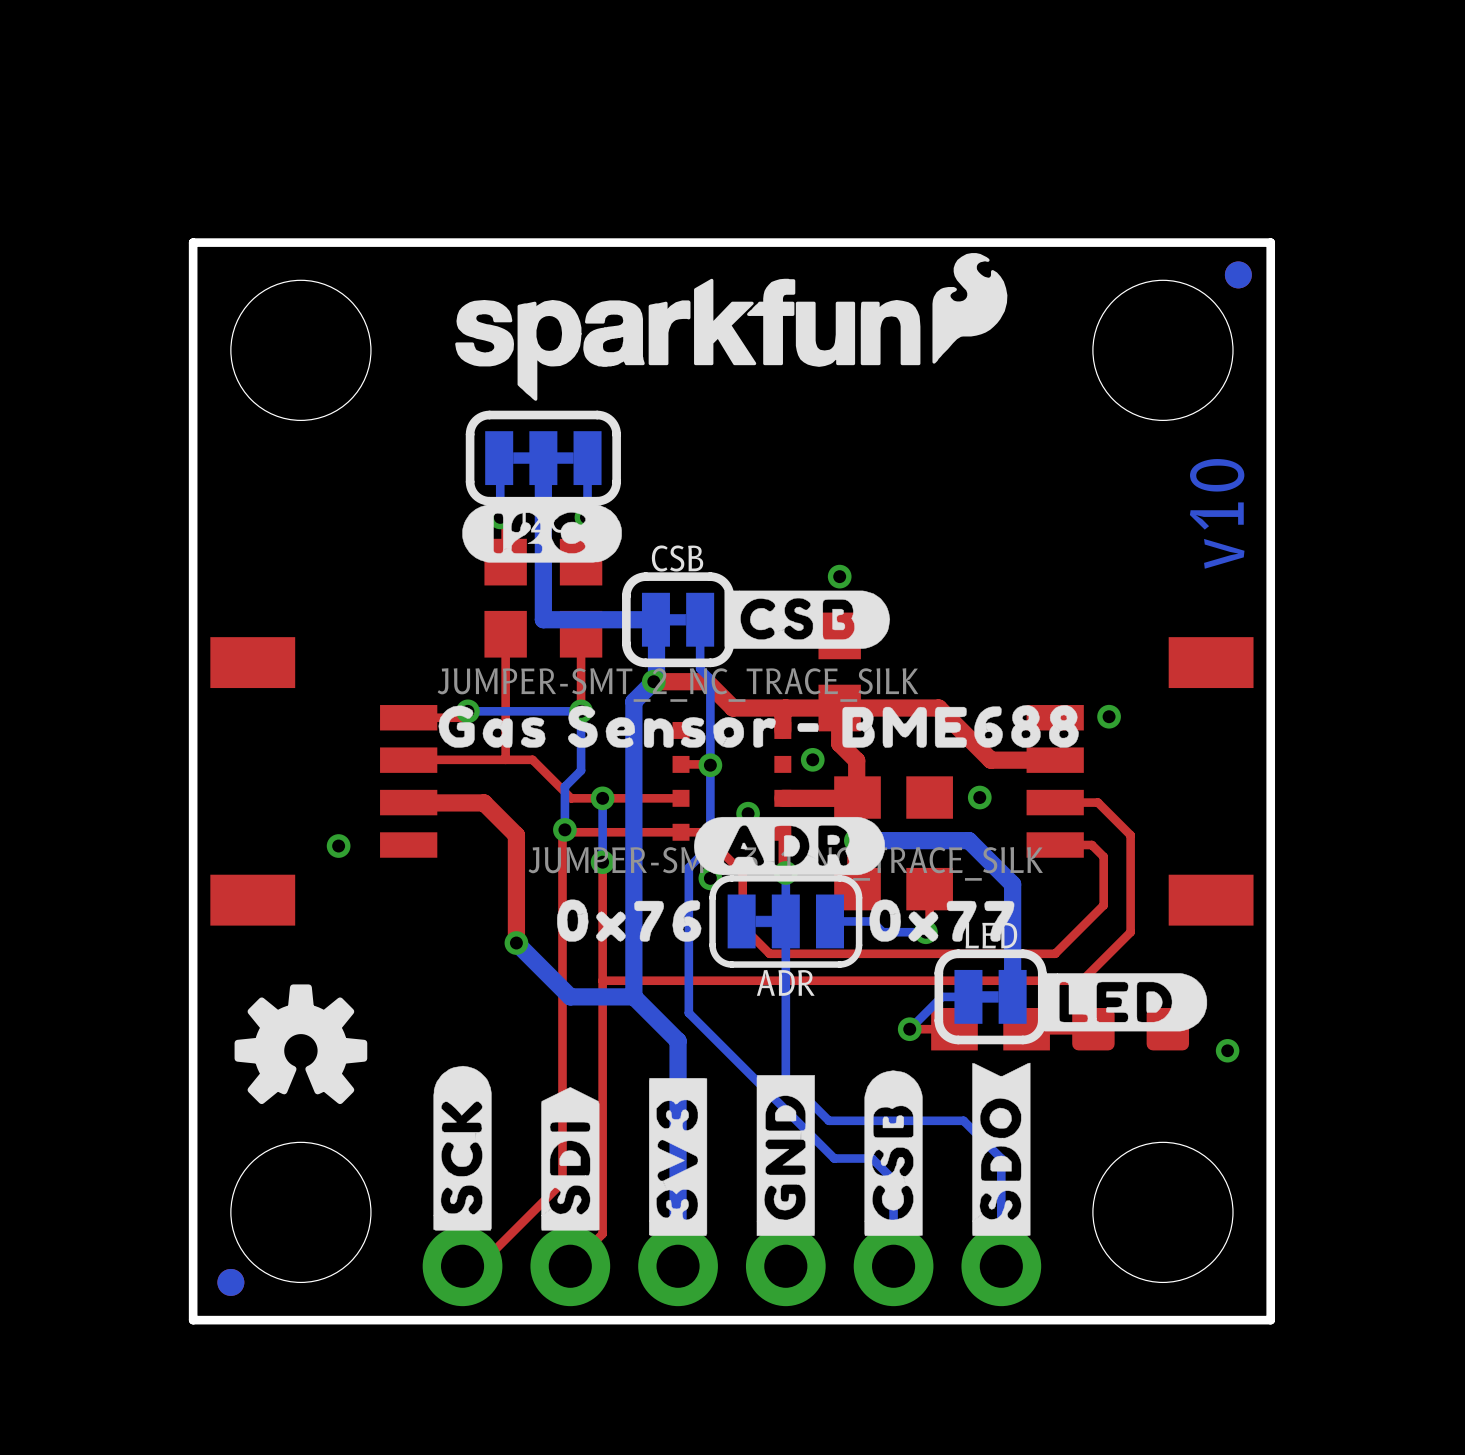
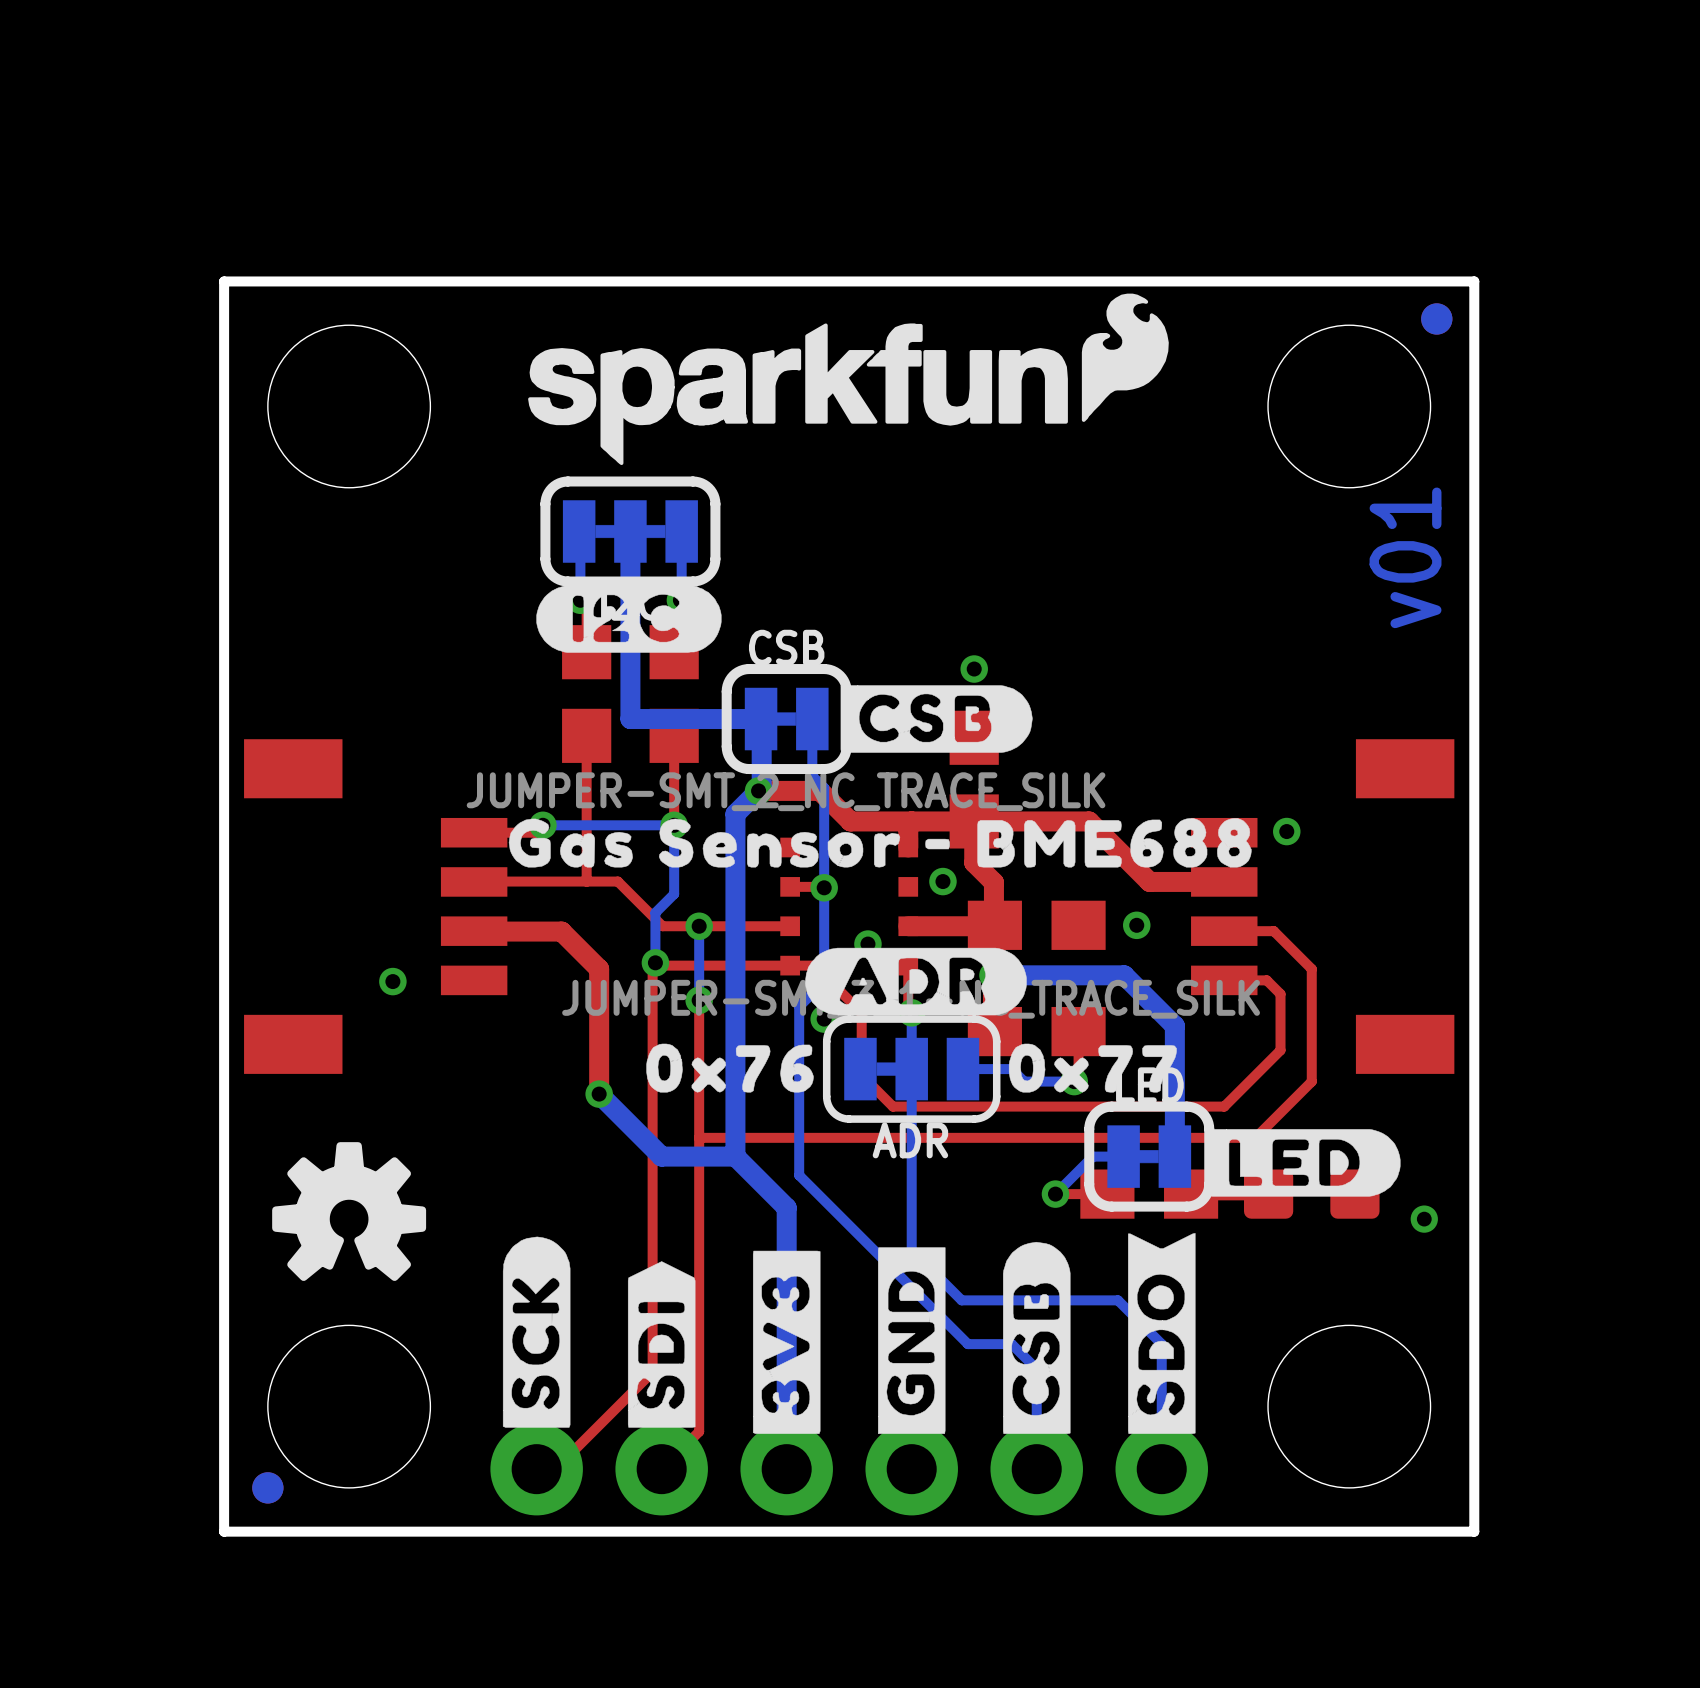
text: v10 (1217, 513) -> v01 (1405, 557)

